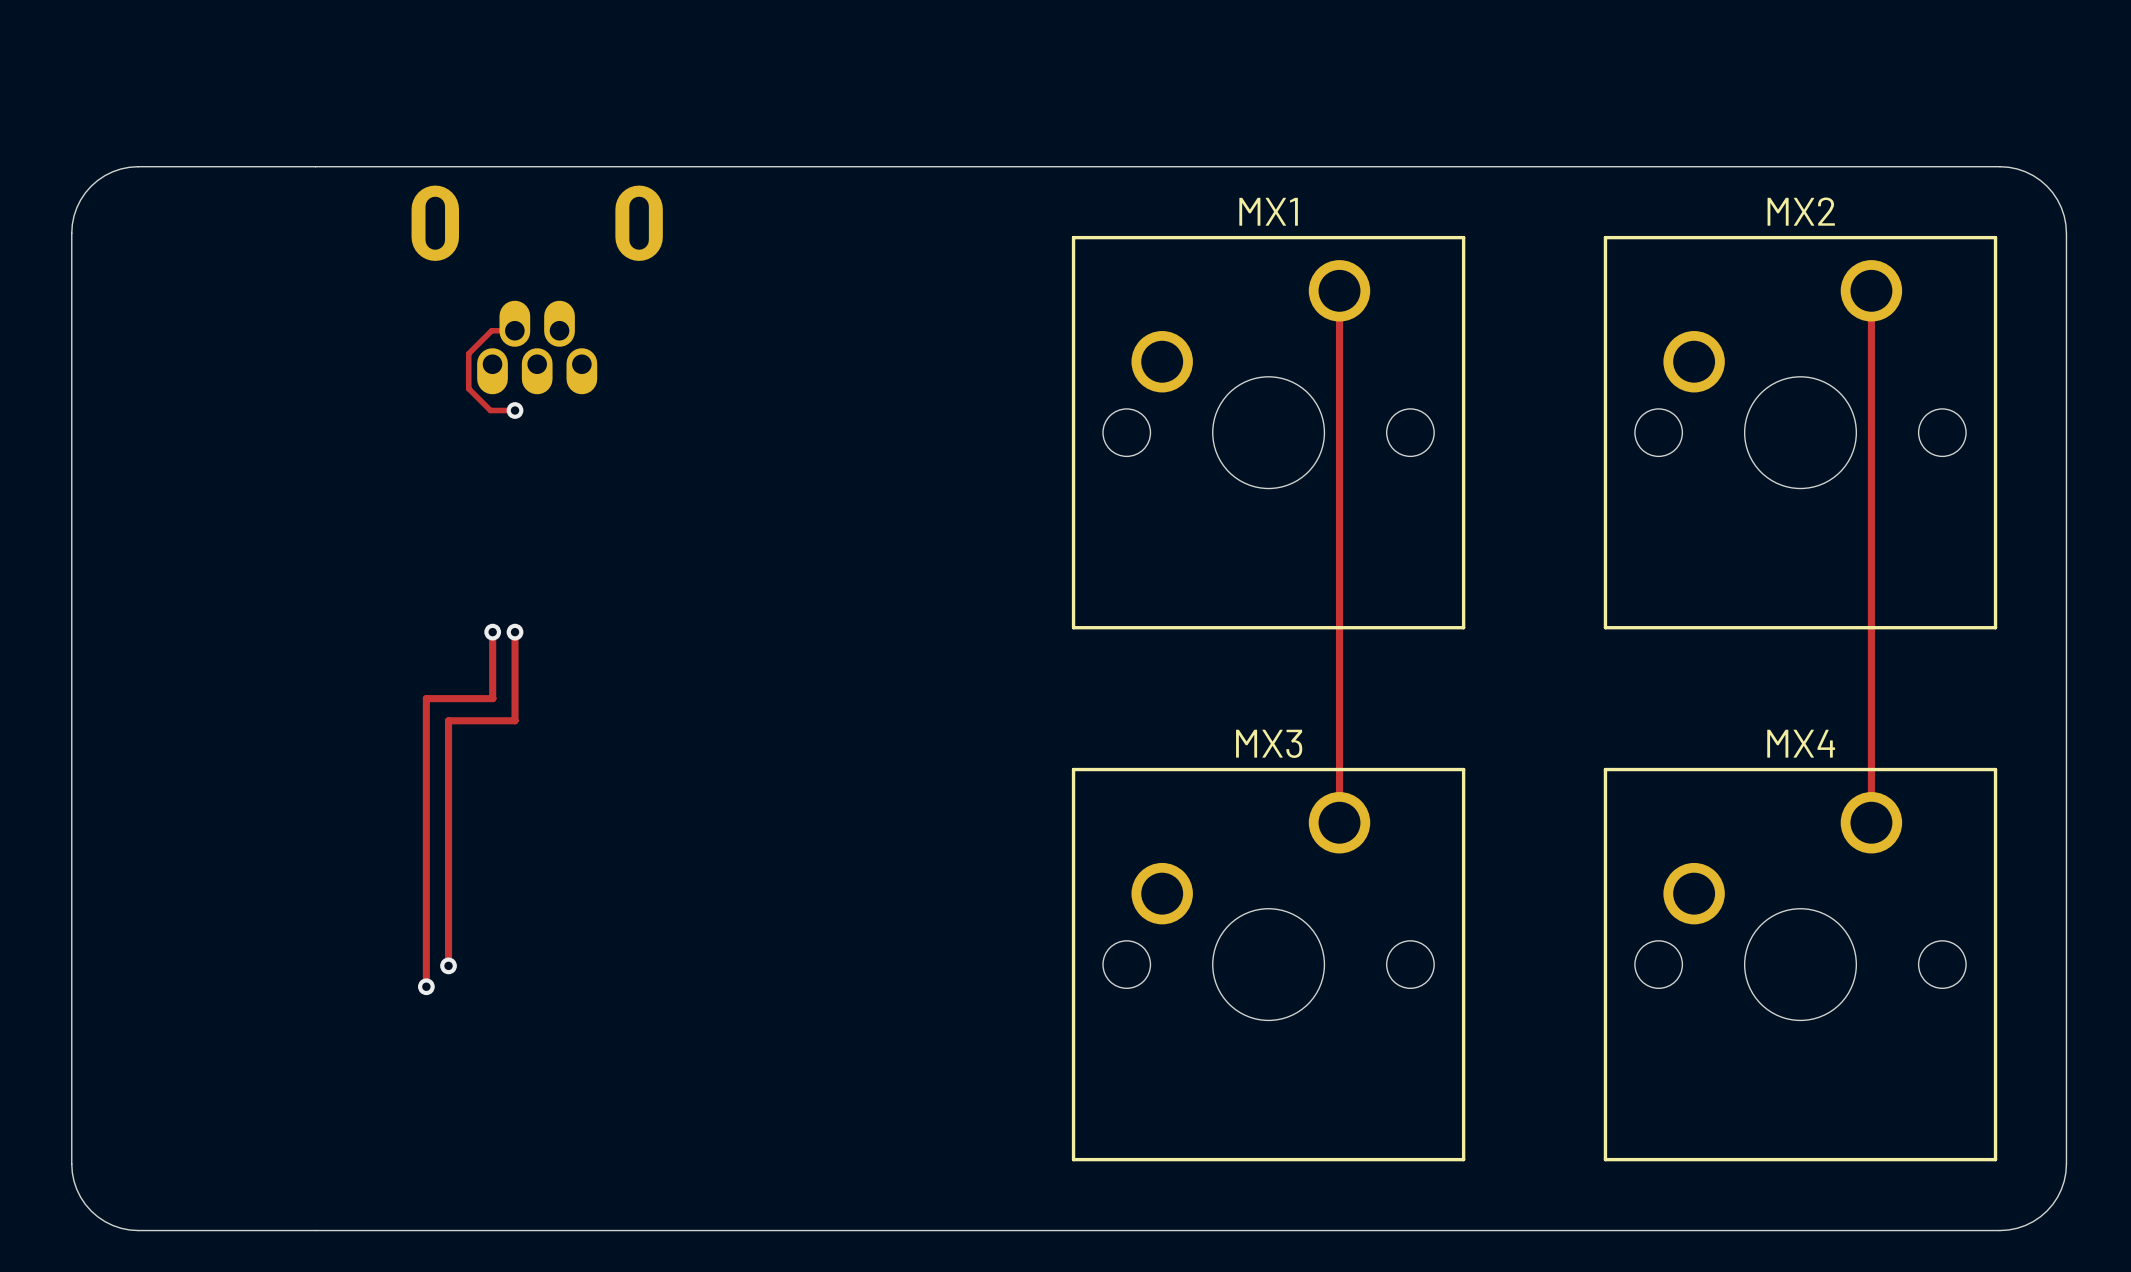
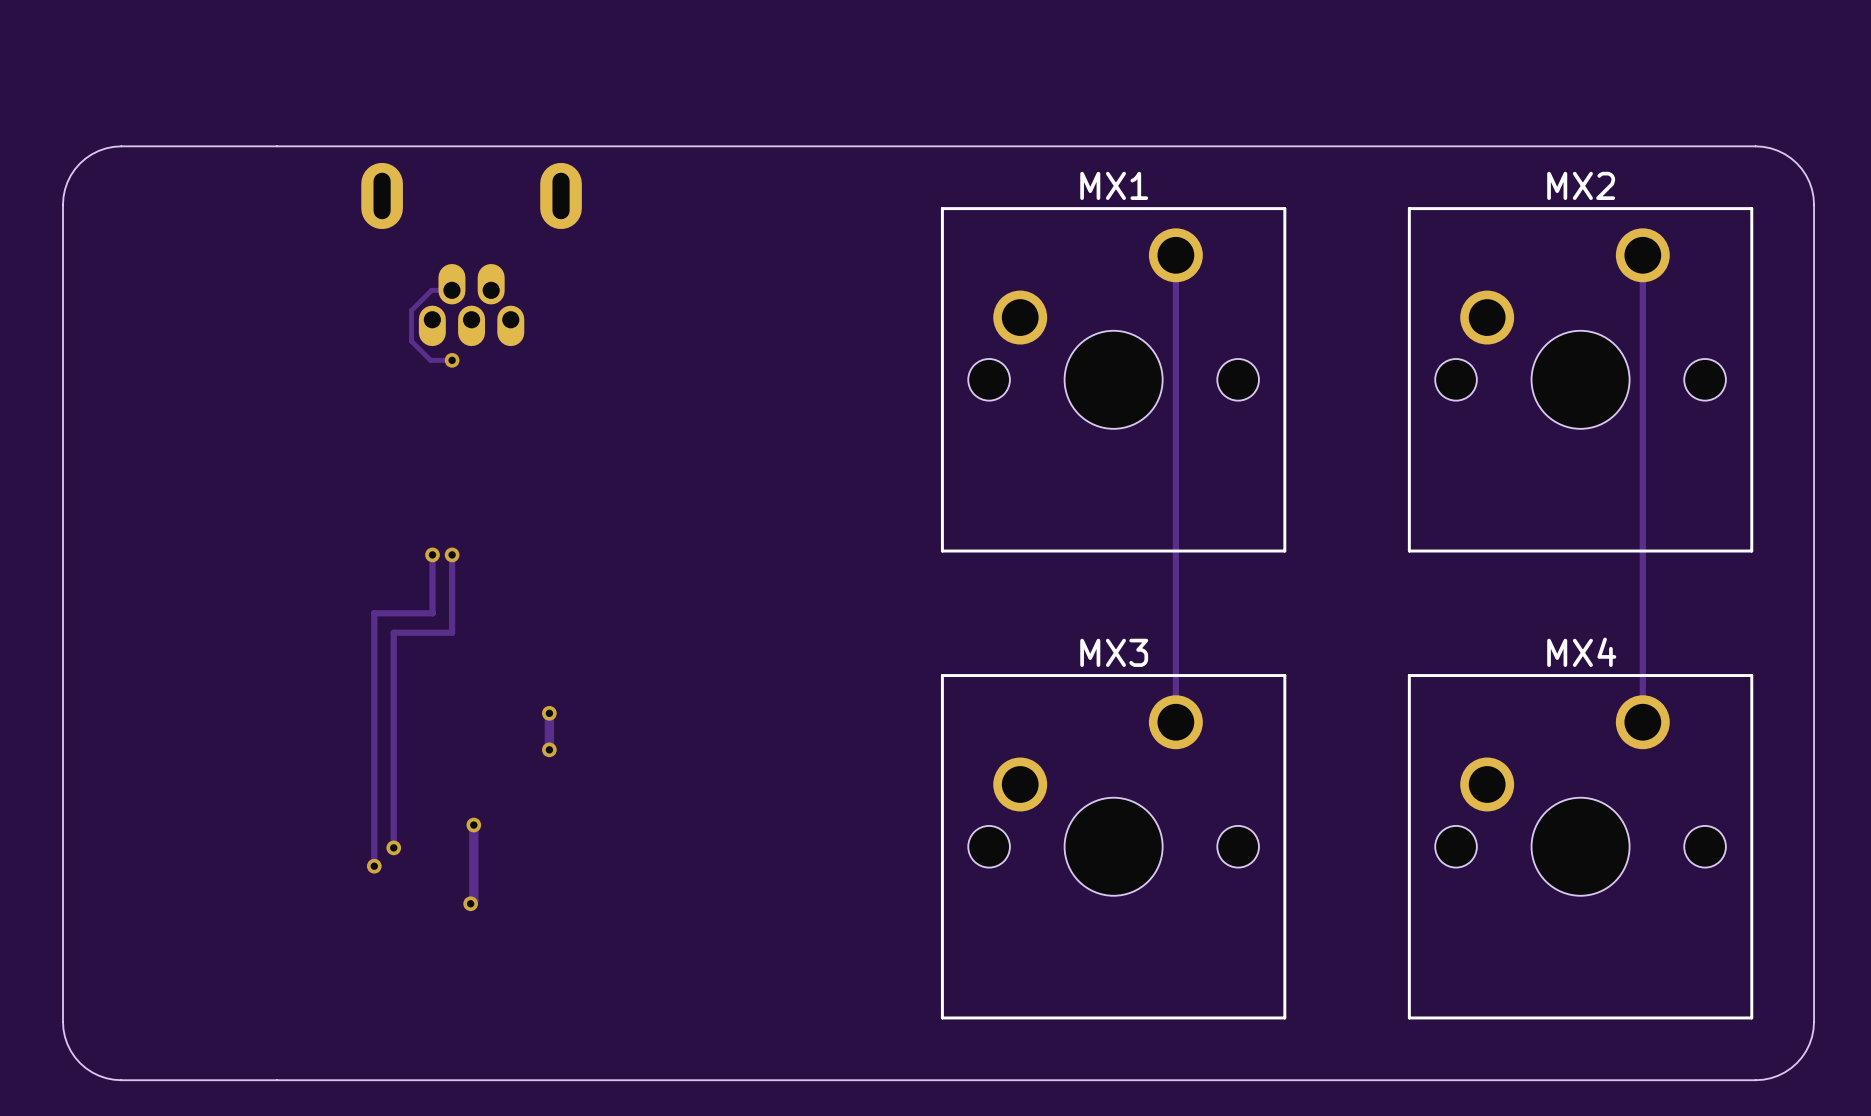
track: none -> (549, 713) (549, 749)
via: none -> (549, 713)
via: none -> (549, 749)
track: none -> (473, 825) (473, 900) (470, 903)
via: none -> (473, 825)
via: none -> (470, 903)

